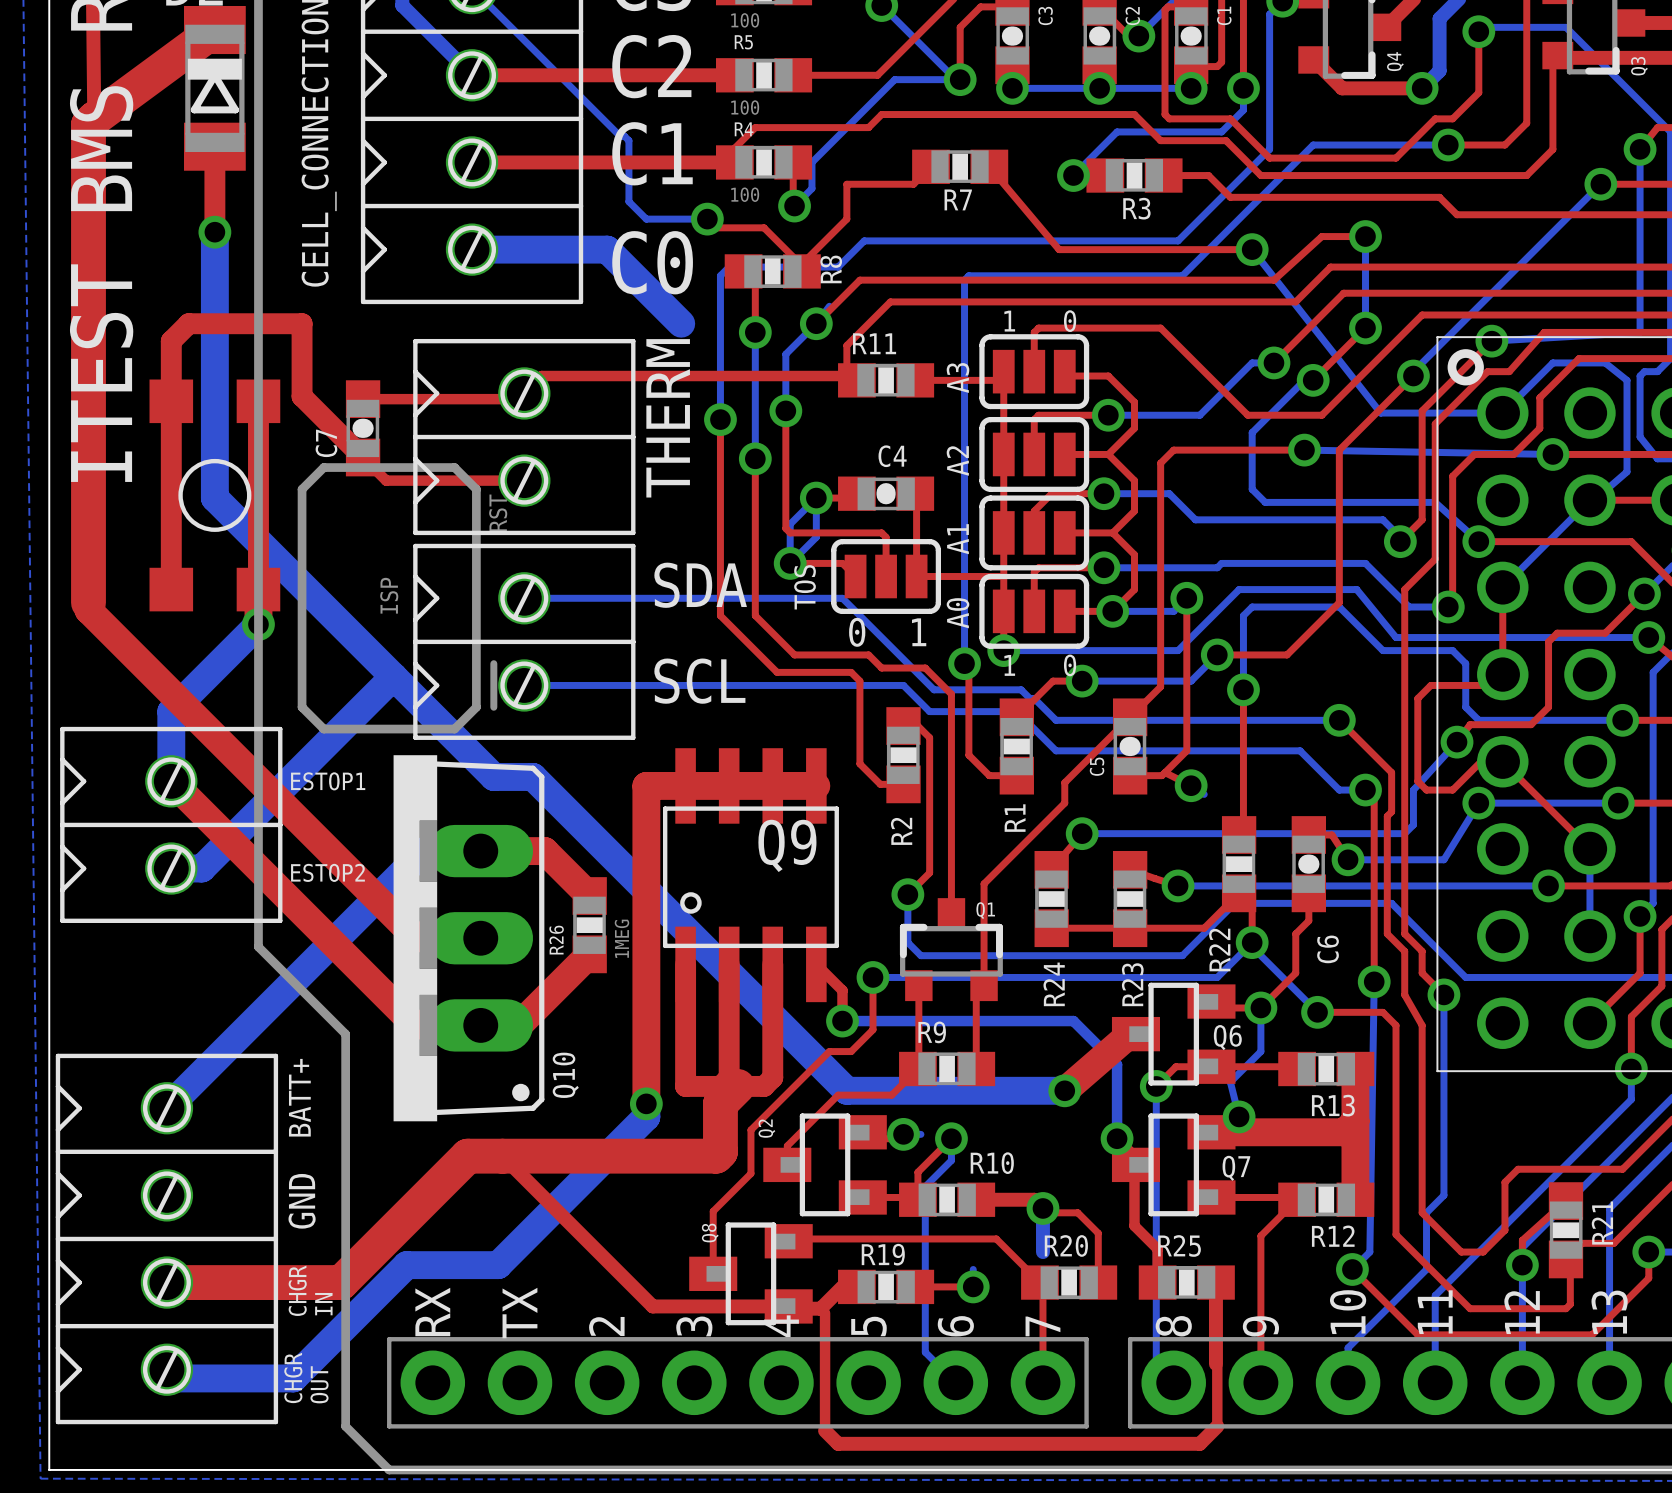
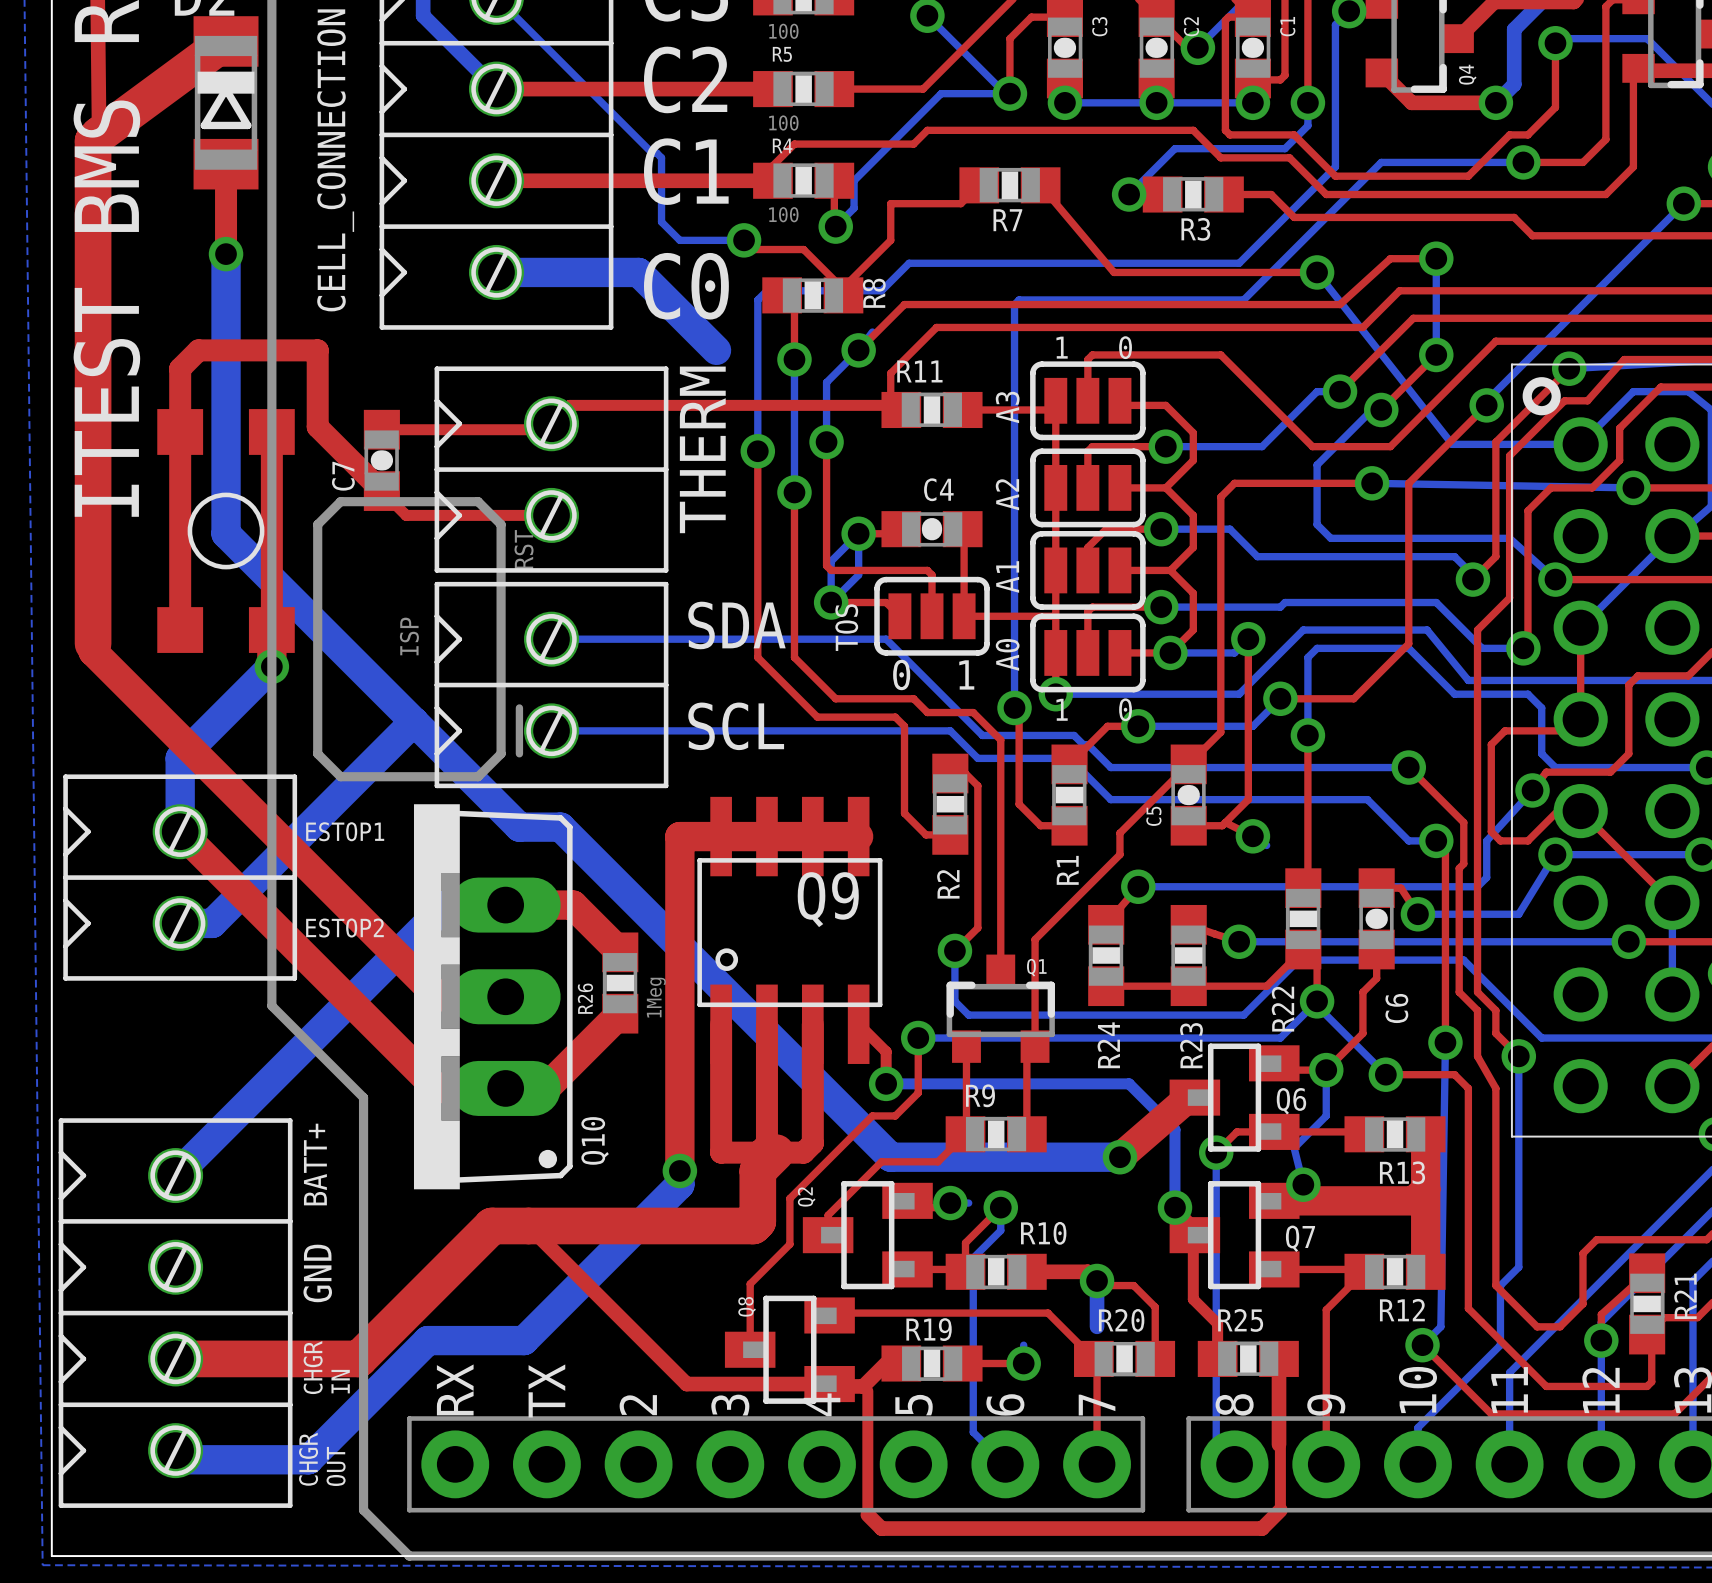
R26 value: 1MEG (621, 938) -> 1Meg (656, 997)

